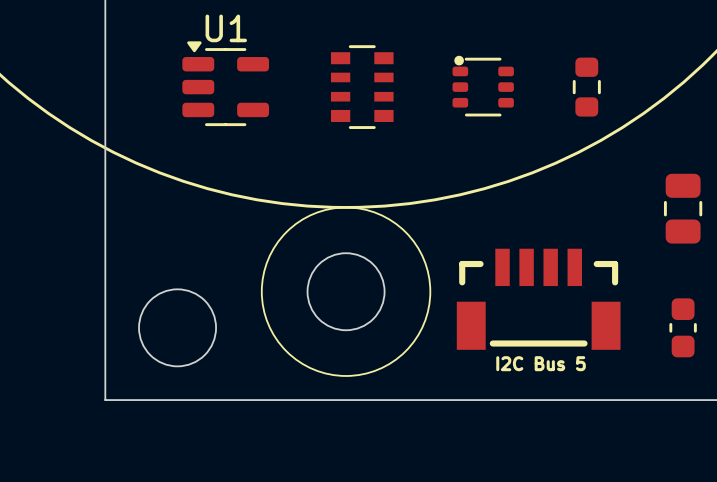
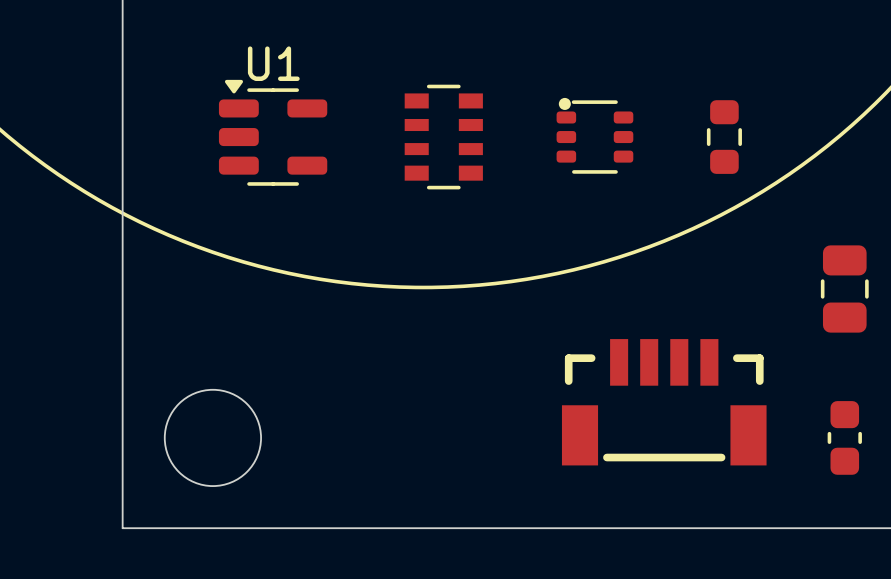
drawing: [261, 206, 431, 377] -> none
round board edge: [306, 252, 386, 331] -> none
text: I2C Bus 5 (541, 363) -> none

